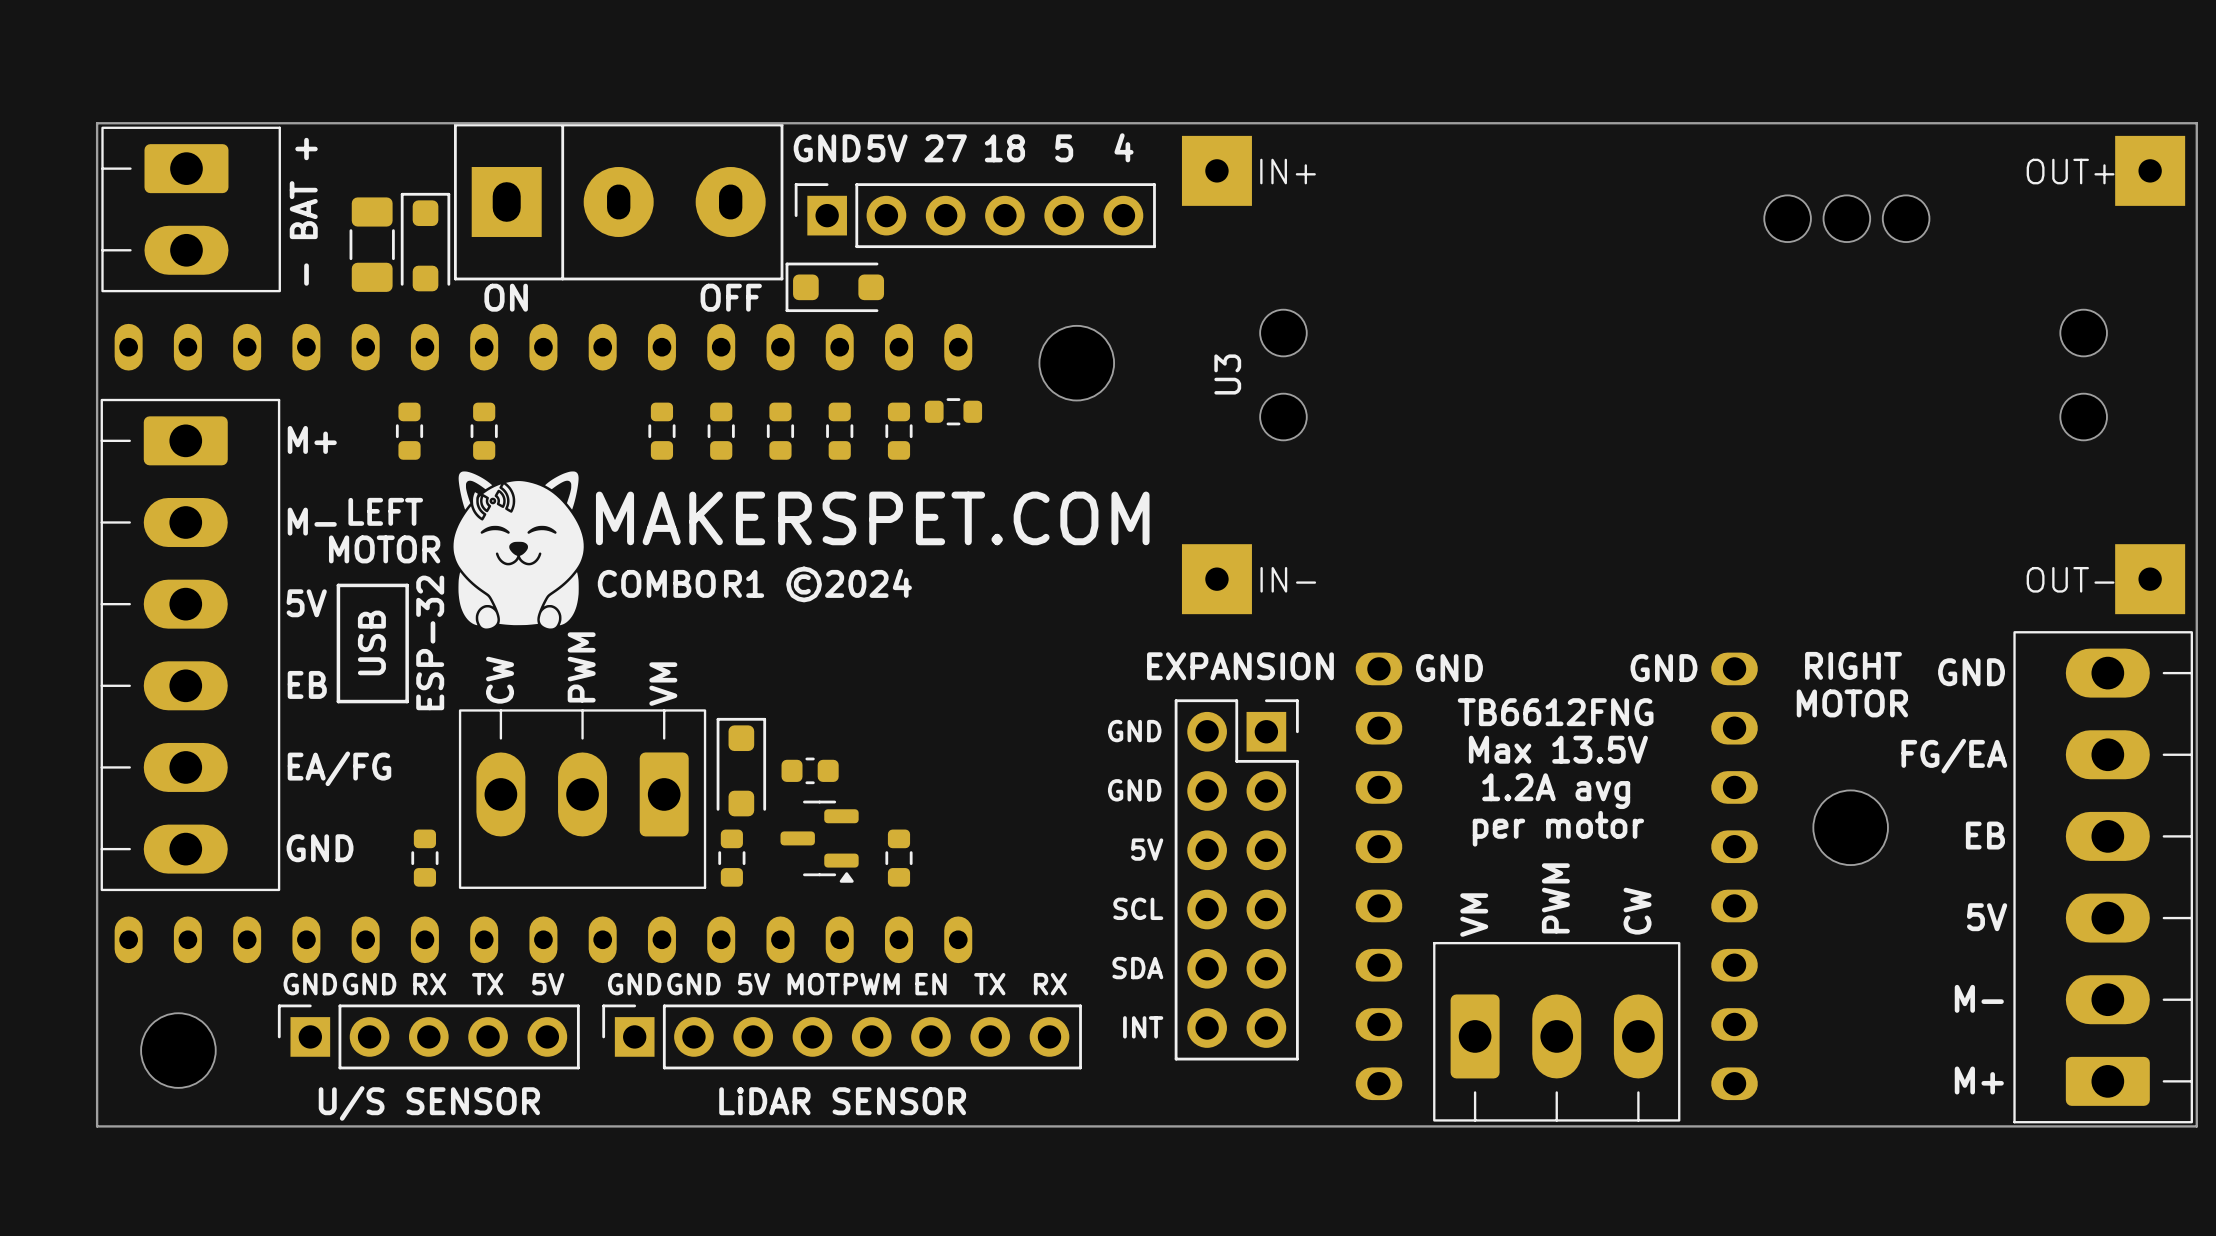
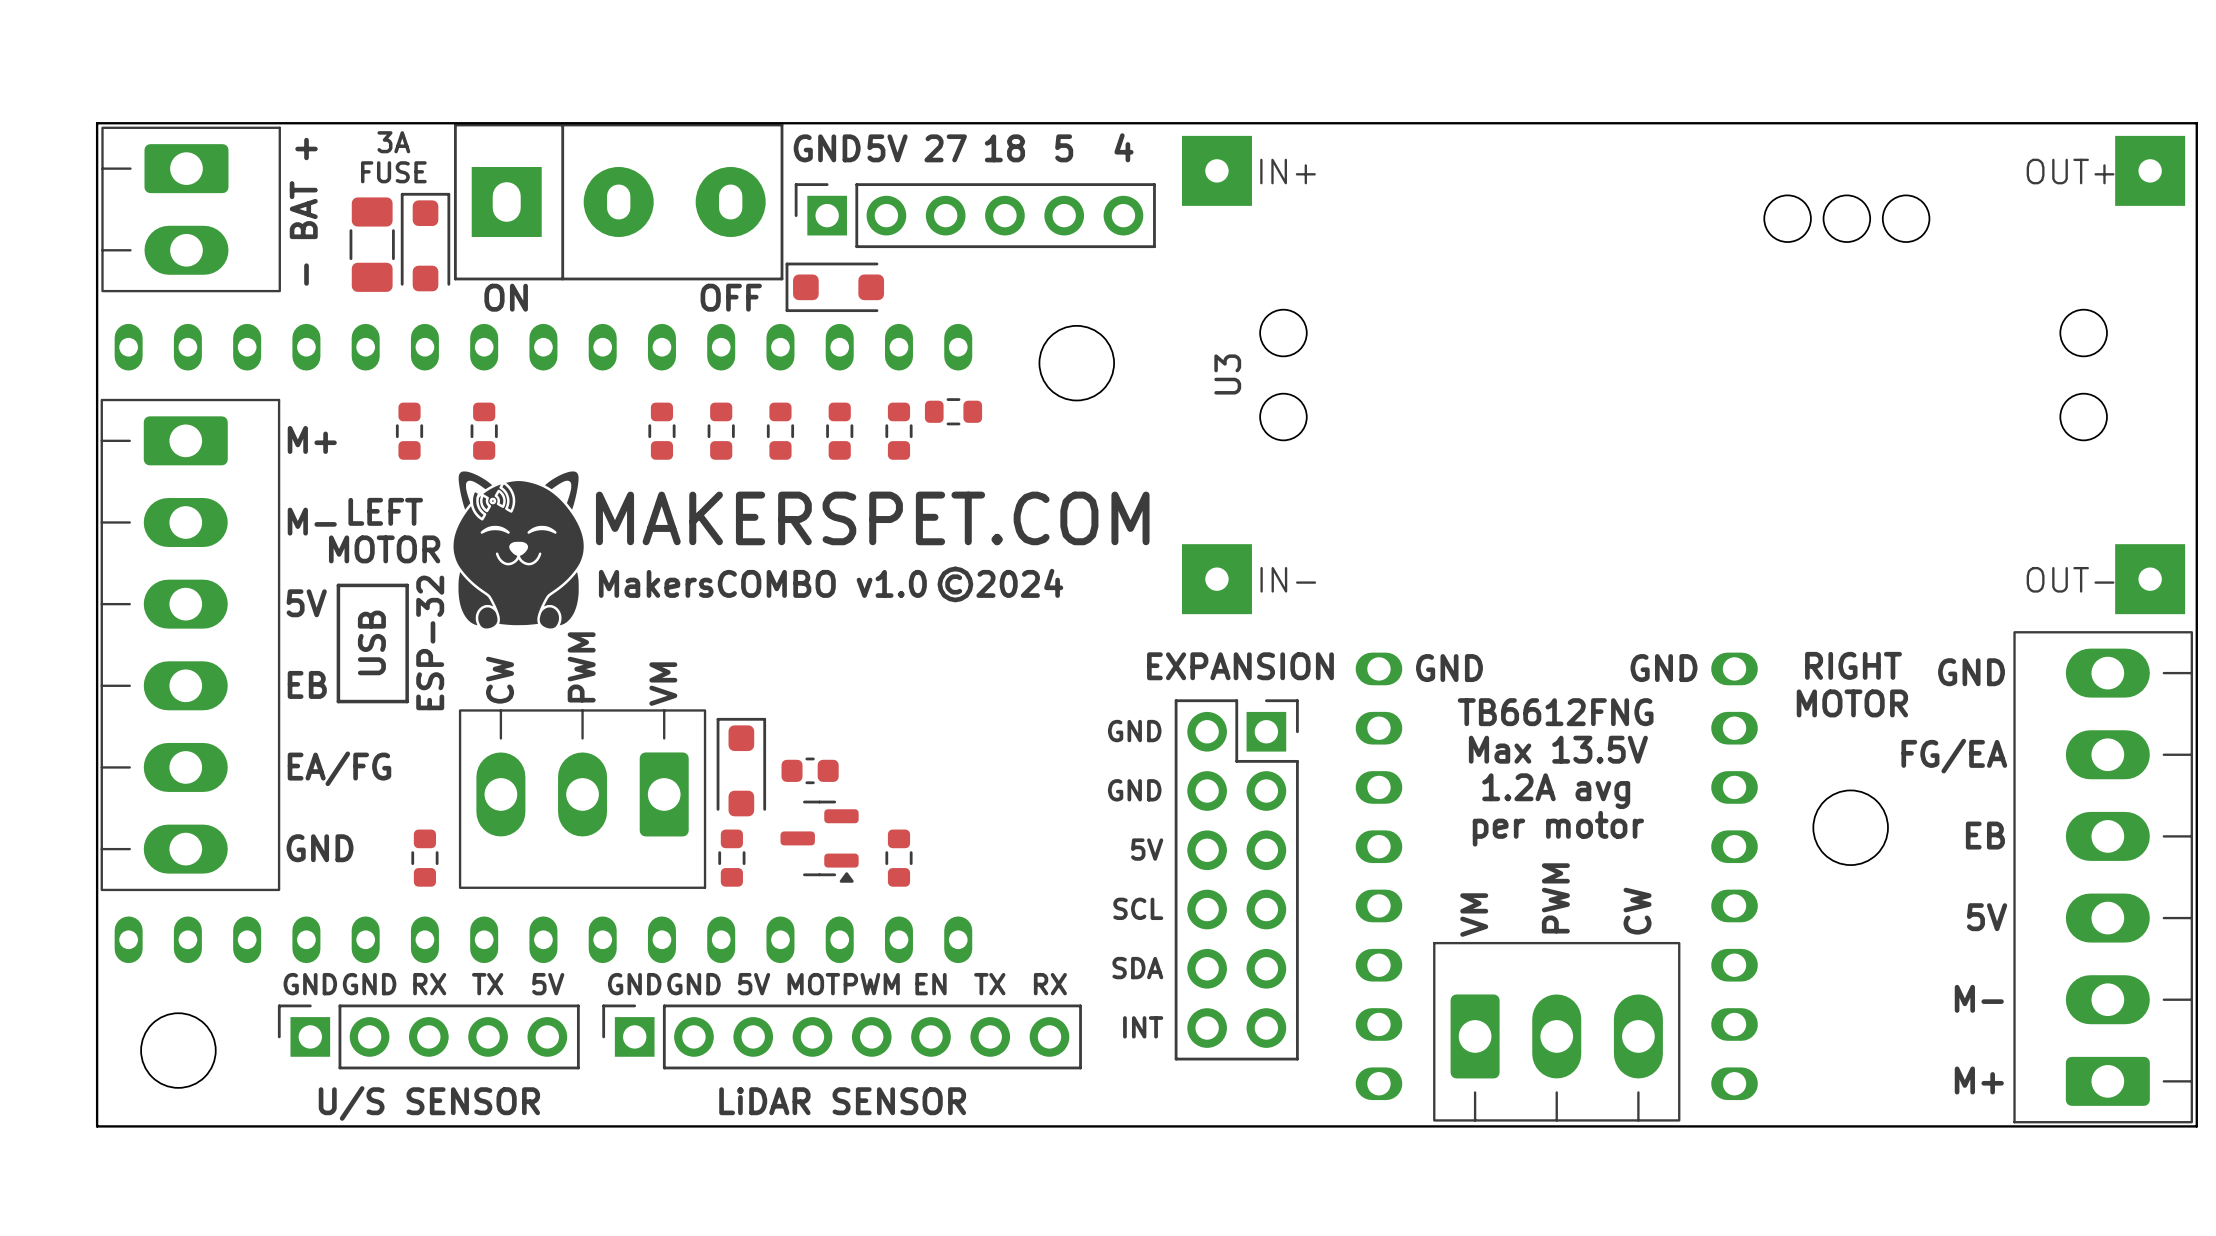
text: none -> 3A (393, 142)
text: none -> FUSE (393, 172)
text: COMBO (656, 583) -> MakersCOMBO v1.0 (762, 583)
text: R1 ©2024 (817, 584) -> none
text: none -> ©2024 (1000, 584)

